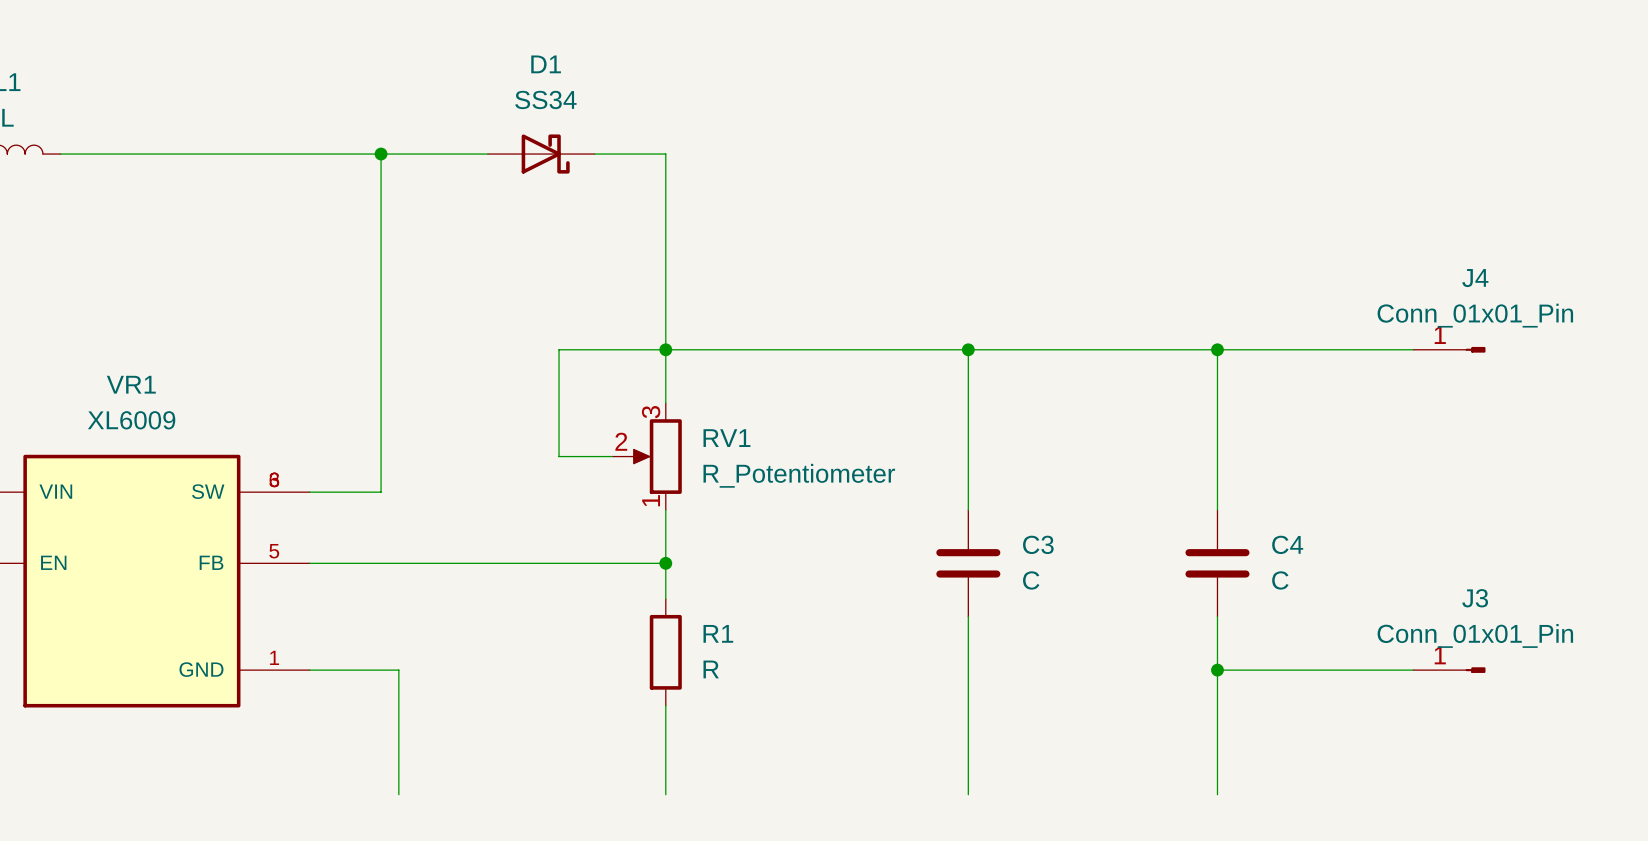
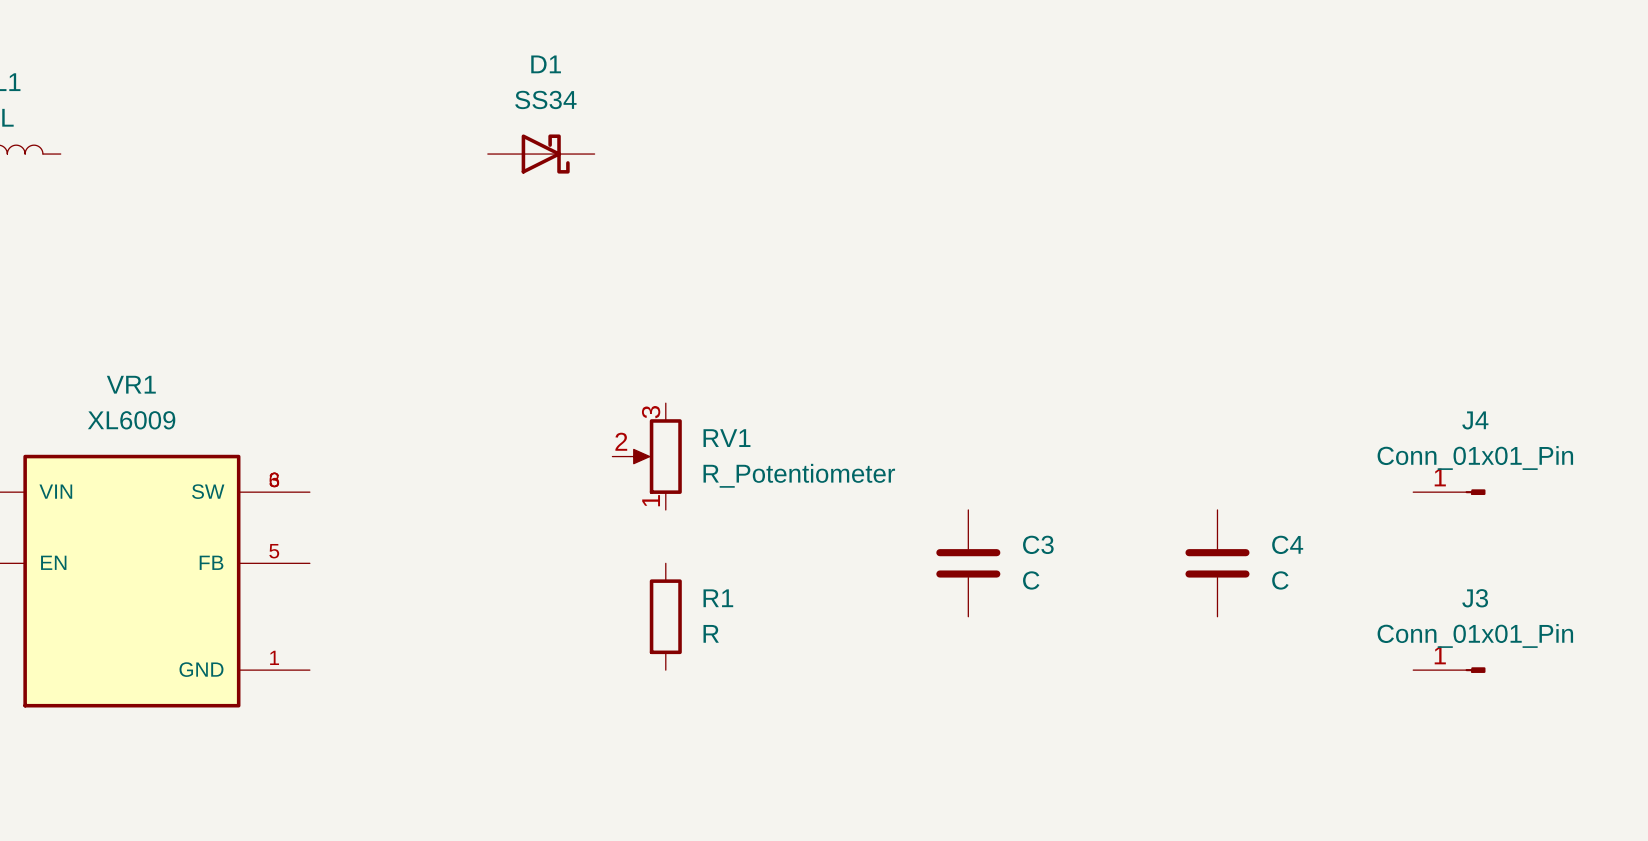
wire: (60, 154) (487, 154) -> none
wire: (381, 154) (381, 492) (309, 492) -> none
junction: (381, 154) -> none
wire: (594, 154) (665, 154) (665, 403) -> none
junction: (665, 349) -> none
wire: (968, 349) (968, 509) -> none
junction: (968, 349) -> none
wire: (1217, 349) (1217, 509) -> none
junction: (1217, 349) -> none
wire: (1413, 349) (559, 349) (559, 456) (612, 456) -> none
J4 position: (1449, 349) -> (1449, 492)
wire: (665, 509) (665, 598) -> none
wire: (309, 563) (665, 563) -> none
junction: (665, 563) -> none
wire: (968, 616) (968, 794) -> none
wire: (1217, 616) (1217, 794) -> none
R1 position: (665, 652) -> (665, 616)
wire: (309, 670) (398, 670) (398, 794) -> none
wire: (1217, 670) (1413, 670) -> none
junction: (1217, 670) -> none
wire: (665, 705) (665, 794) -> none

